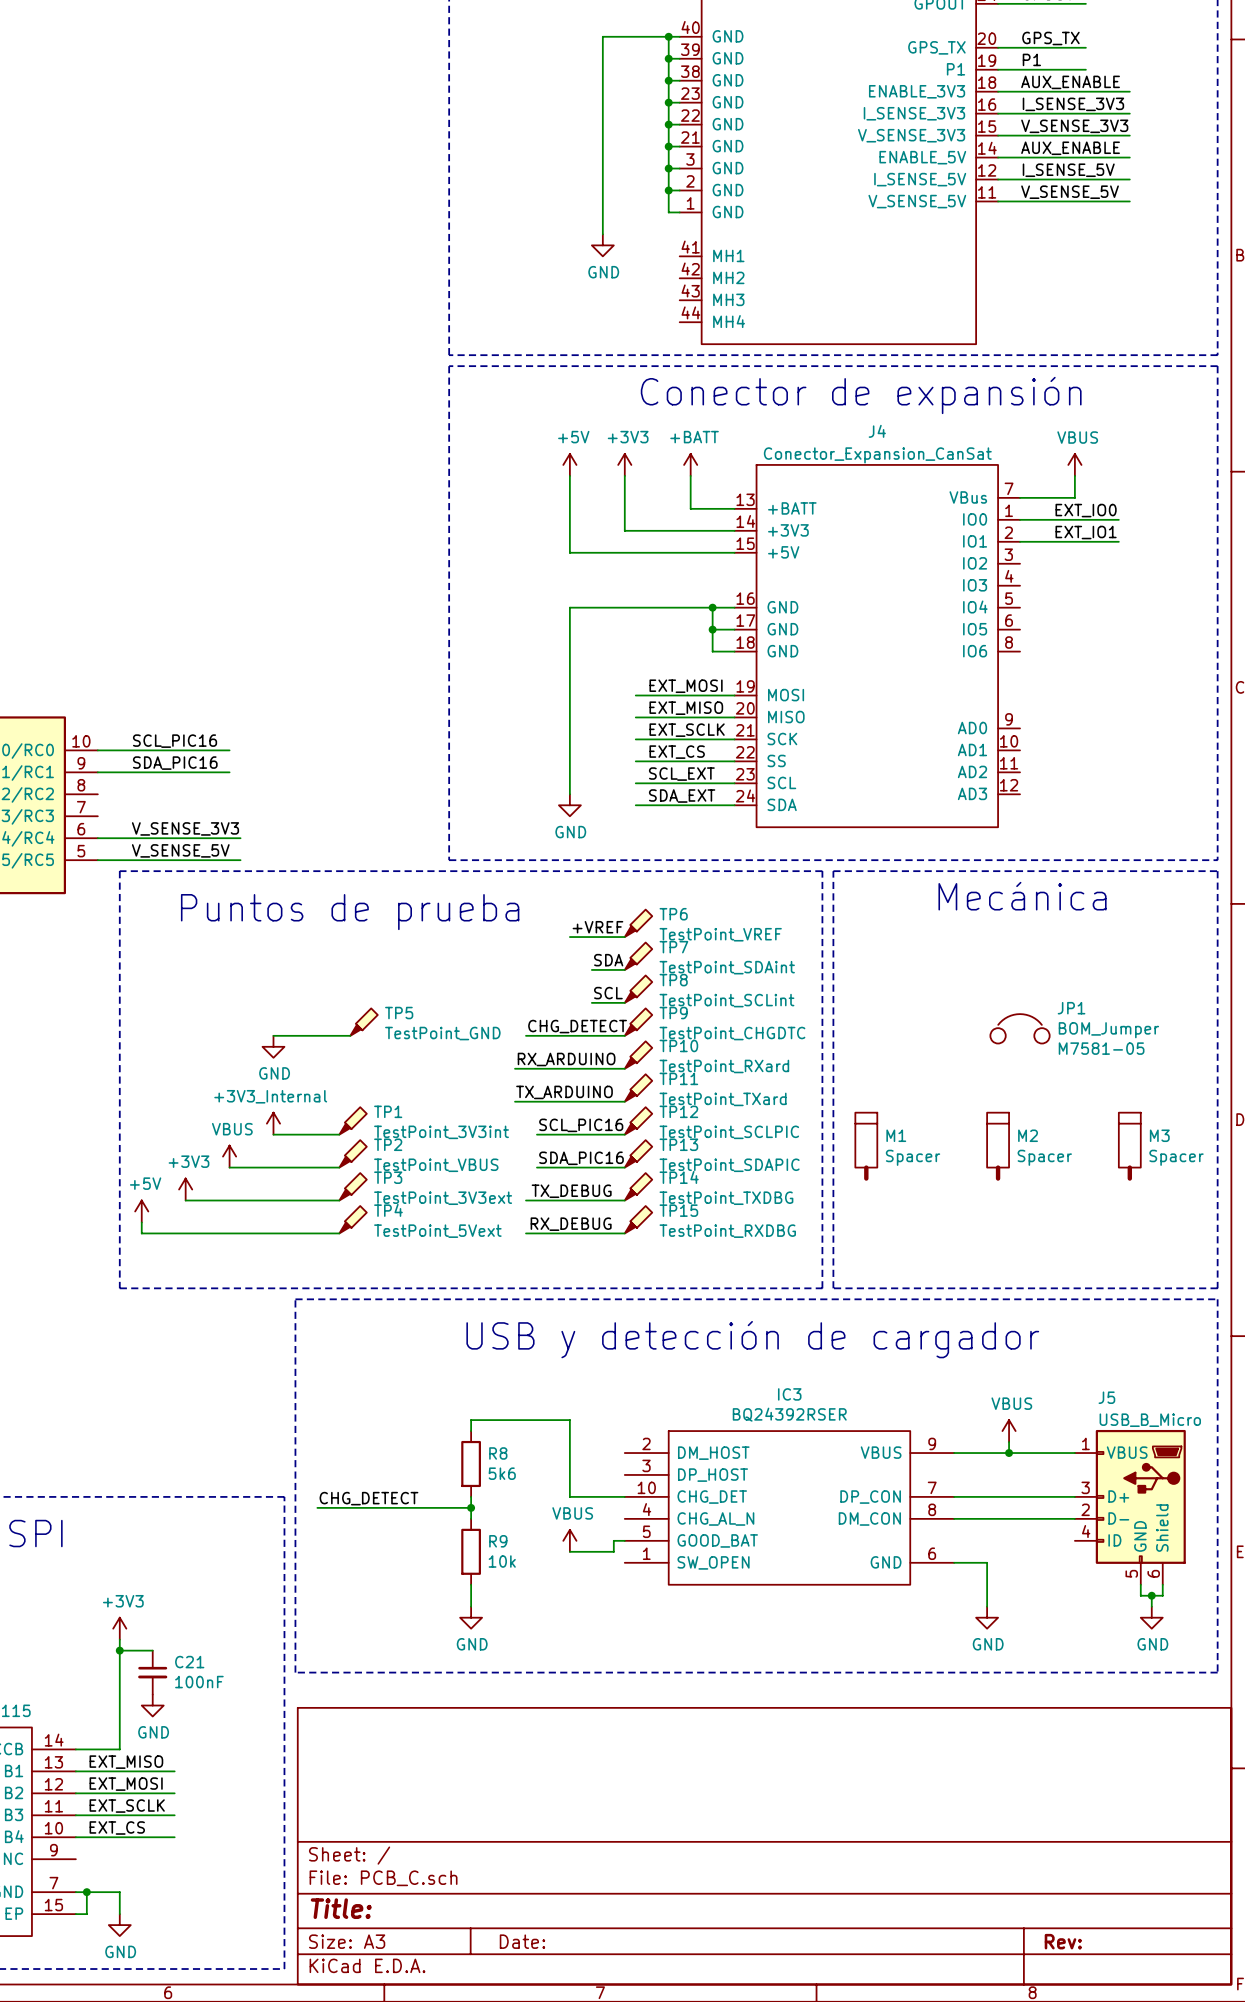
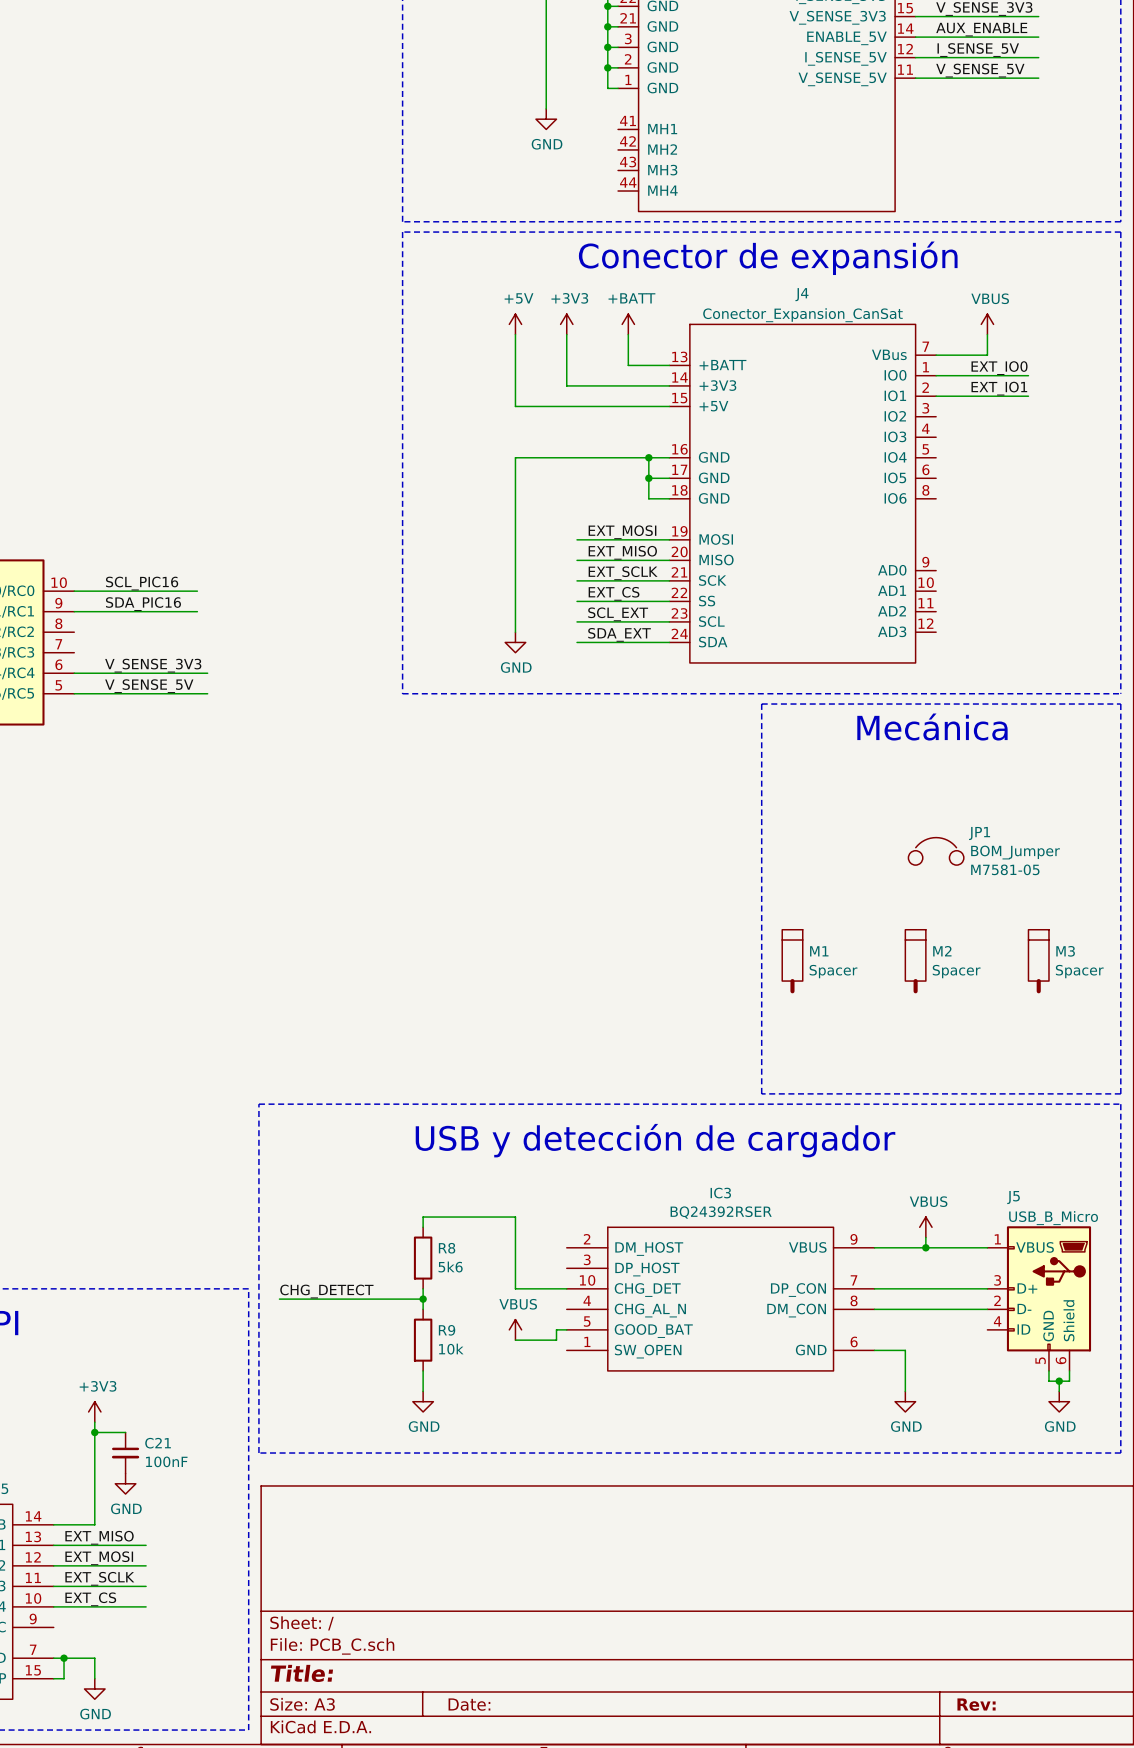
line: (119, 871) (822, 871) (822, 1288) (119, 1288) (119, 871) -> none
text: Puntos de prueba (350, 912) -> none
TP6: TestPoint_VREF (638, 923) -> none
label: +VREF (597, 927) -> none
wire: (569, 937) (624, 937) -> none
TP7: TestPoint_SDAint (638, 956) -> none
label: SDA (608, 960) -> none
wire: (591, 969) (624, 969) -> none
TP8: TestPoint_SCLint (638, 989) -> none
label: SCL (608, 993) -> none
wire: (591, 1002) (624, 1002) -> none
TP5: TestPoint_GND (364, 1022) -> none
TP9: TestPoint_CHGDTC (638, 1022) -> none
label: CHG_DETECT (577, 1026) -> none
wire: (273, 1035) (350, 1035) -> none
wire: (525, 1035) (624, 1035) -> none
power symbol: GND (273, 1046) -> none
TP10: TestPoint_RXard (638, 1055) -> none
label: RX_ARDUINO (566, 1059) -> none
wire: (515, 1068) (624, 1068) -> none
TP11: TestPoint_TXard (638, 1087) -> none
label: TX_ARDUINO (564, 1092) -> none
wire: (515, 1101) (624, 1101) -> none
TP1: TestPoint_3V3int (353, 1120) -> none
TP12: TestPoint_SCLPIC (638, 1120) -> none
power symbol: +3V3_Internal (273, 1123) -> none
label: SCL_PIC16 (581, 1125) -> none
wire: (273, 1134) (339, 1134) -> none
wire: (536, 1134) (624, 1134) -> none
TP2: TestPoint_VBUS (353, 1153) -> none
TP13: TestPoint_SDAPIC (638, 1153) -> none
power symbol: VBUS (229, 1156) -> none
label: SDA_PIC16 (581, 1158) -> none
wire: (229, 1167) (339, 1167) -> none
wire: (536, 1167) (624, 1167) -> none
TP3: TestPoint_3V3ext (353, 1186) -> none
TP14: TestPoint_TXDBG (638, 1186) -> none
power symbol: +3V3 (185, 1189) -> none
label: TX_DEBUG (571, 1191) -> none
wire: (185, 1200) (339, 1200) -> none
wire: (525, 1200) (624, 1200) -> none
power symbol: +5V (141, 1211) -> none
TP4: TestPoint_5Vext (353, 1219) -> none
TP15: TestPoint_RXDBG (638, 1219) -> none
wire: (141, 1222) (141, 1233) (339, 1233) -> none
label: RX_DEBUG (571, 1224) -> none
wire: (525, 1233) (624, 1233) -> none

